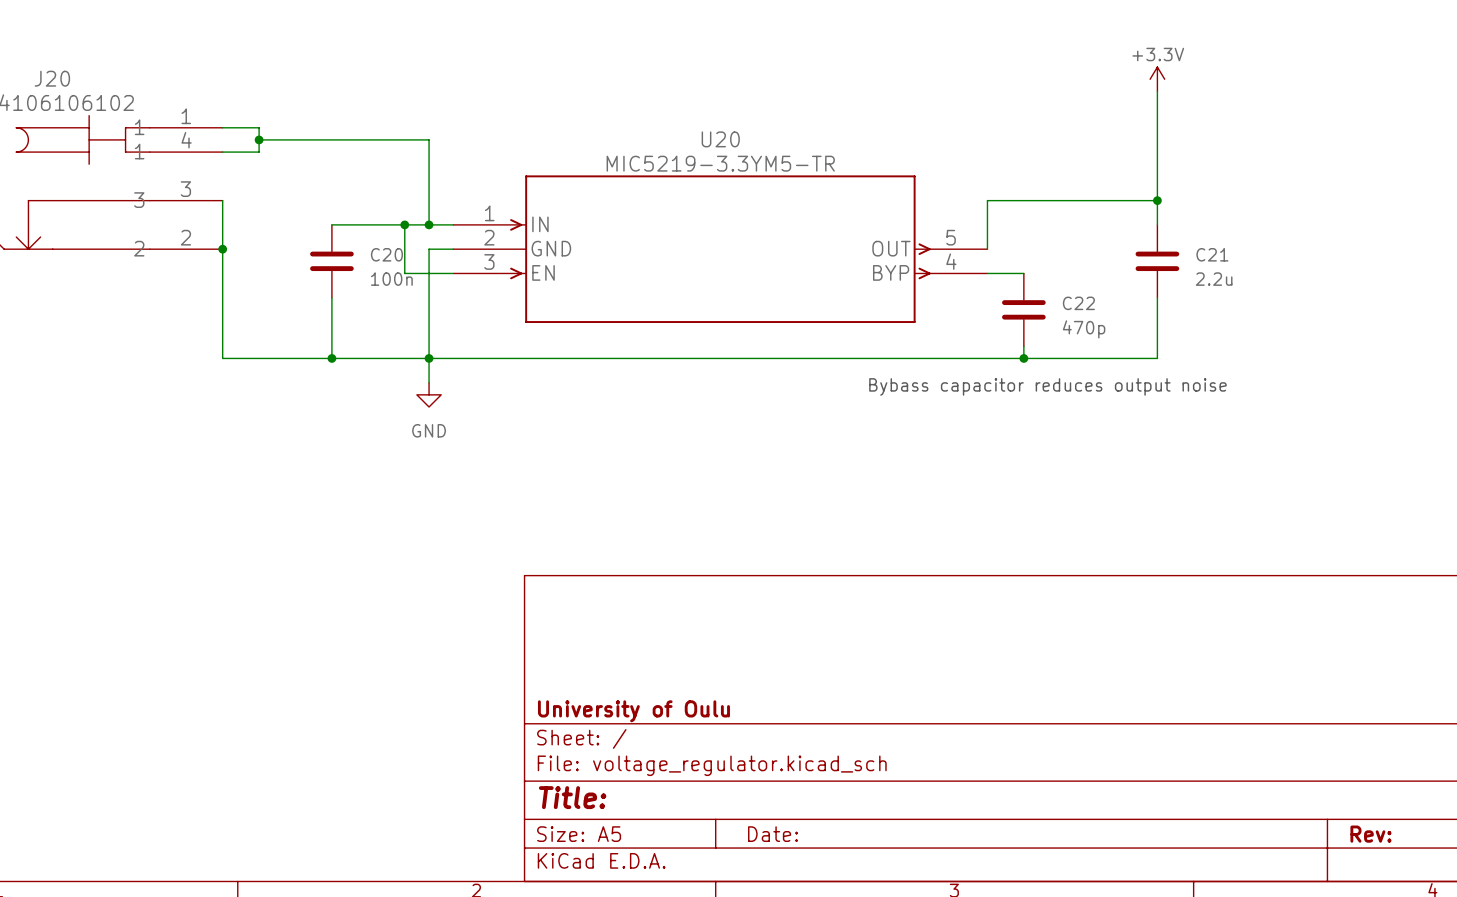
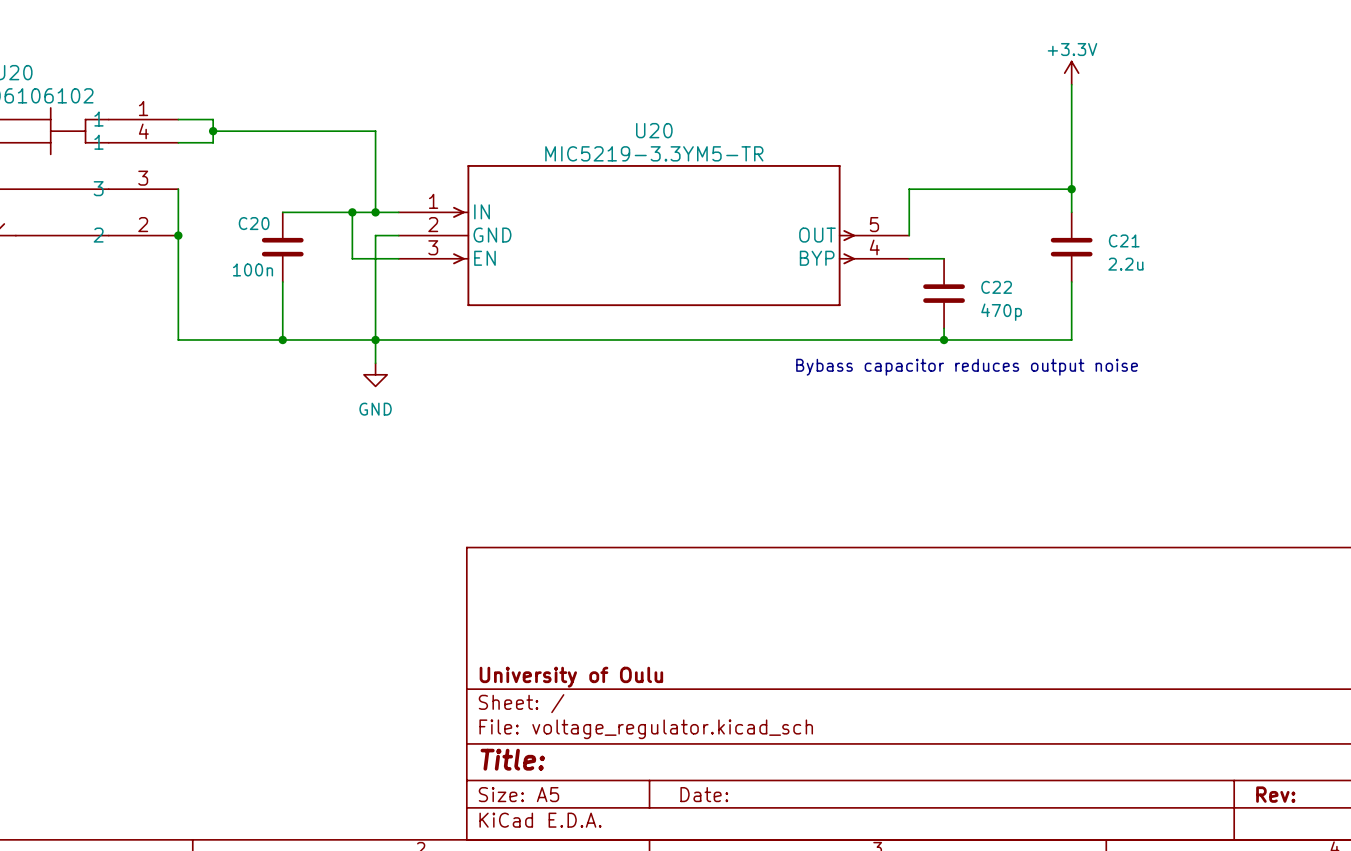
C20 name position: C20 (386, 254) -> C20 (254, 223)
C20 value position: 100n (391, 279) -> 100n (253, 269)

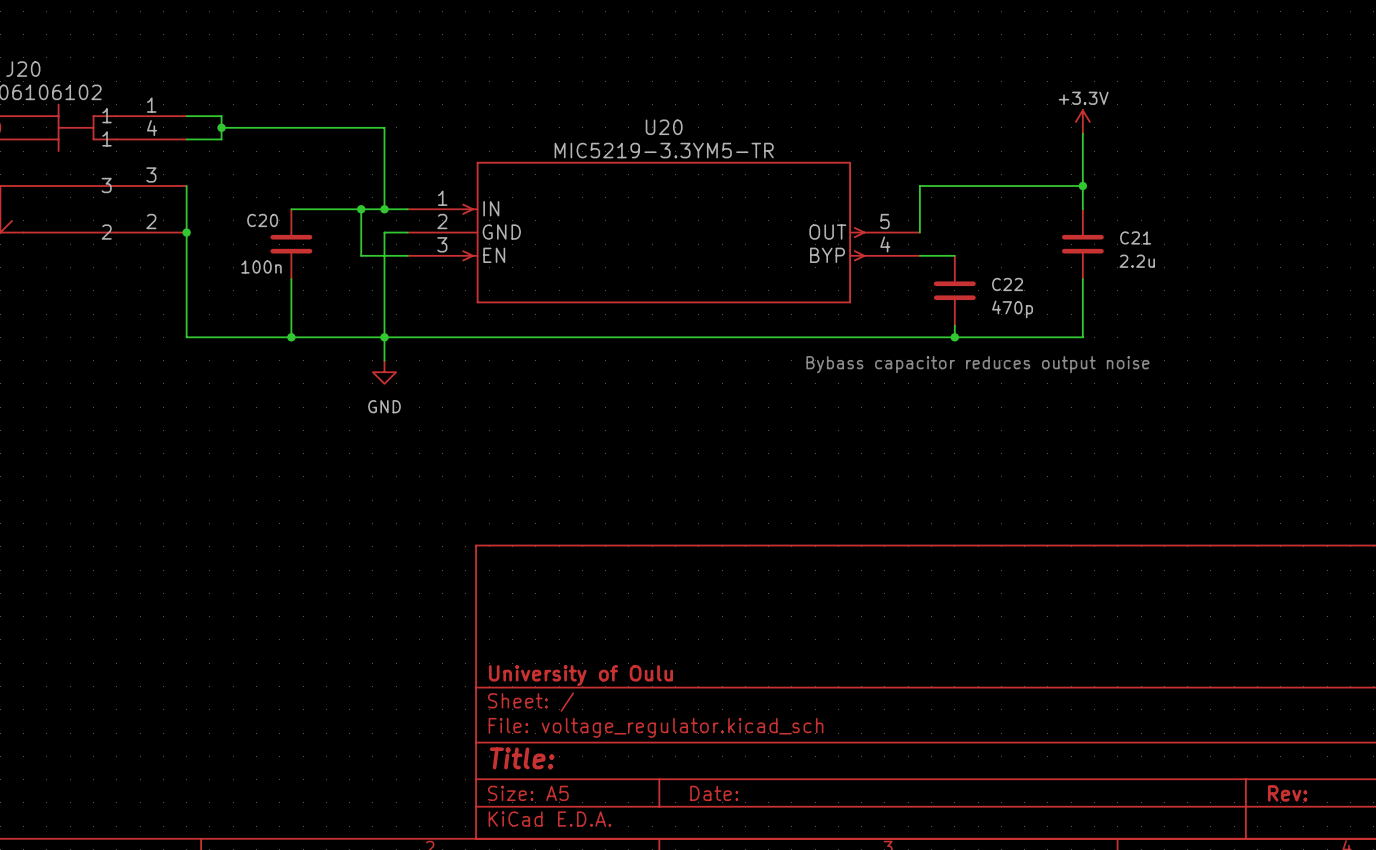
power symbol position: +3.3V (1071, 73) -> +3.3V (1082, 121)
wire: (1071, 84) (1071, 136) -> none

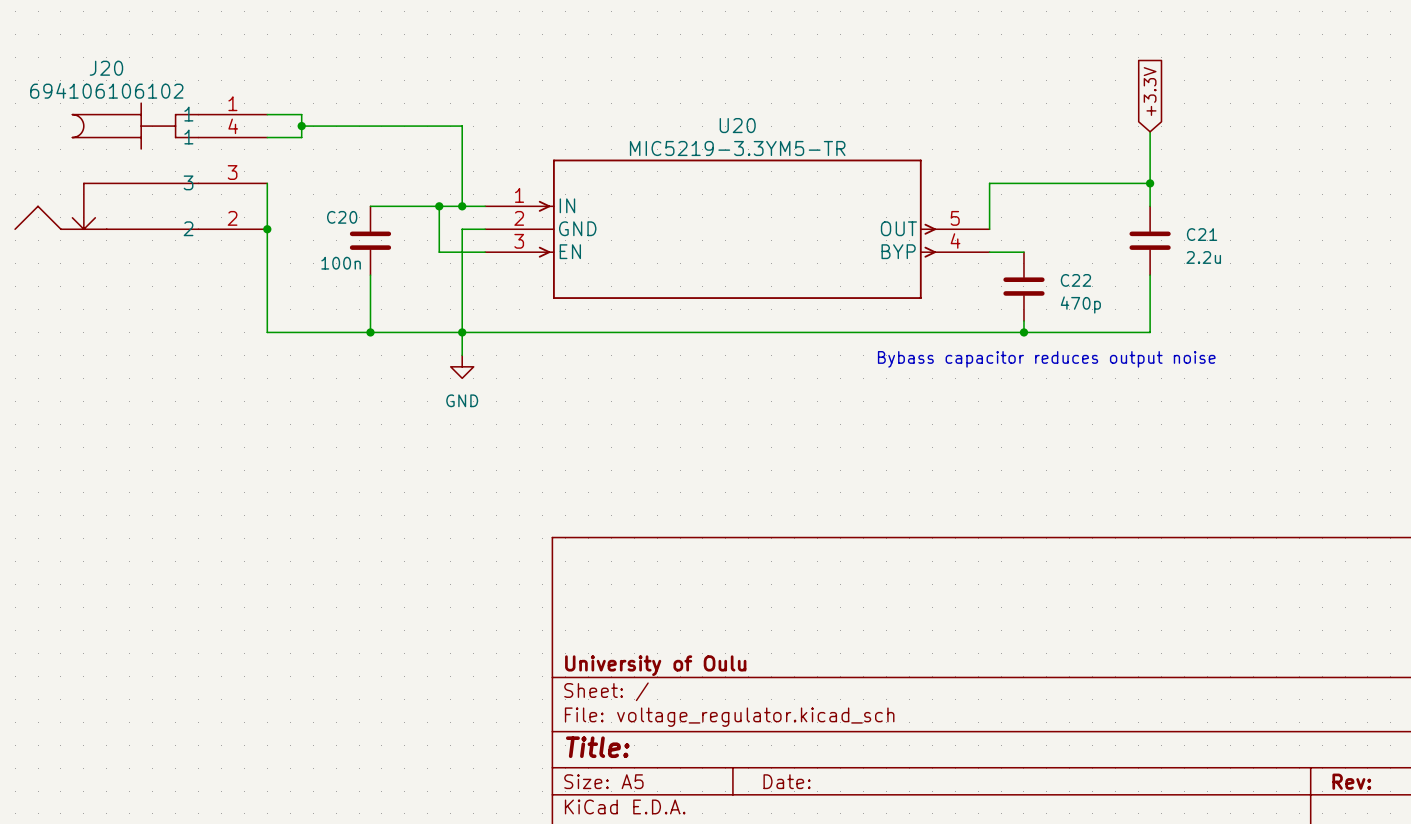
global label: none -> +3.3V (1150, 91)
power symbol: +3.3V (1082, 121) -> none

